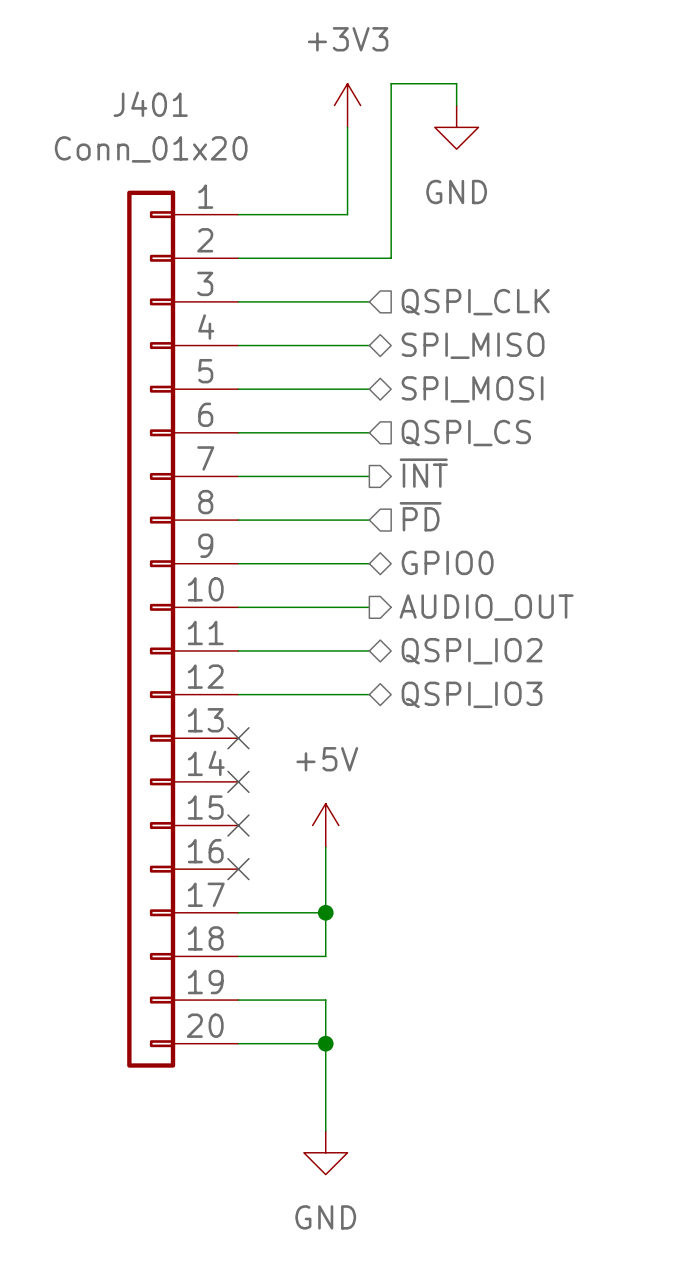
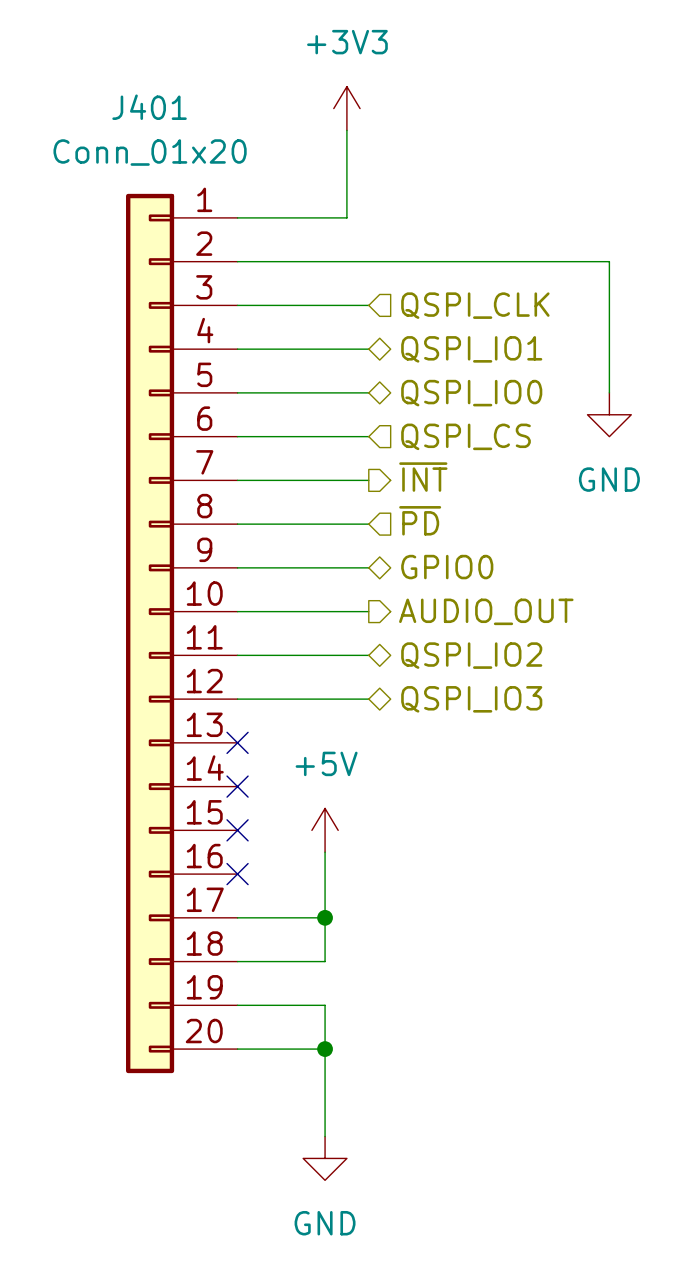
wire: (456, 105) (456, 83) (391, 83) (391, 258) -> (609, 392) (609, 261) (390, 261)
power symbol position: GND (456, 127) -> GND (609, 414)
hierarchical label: SPI_MISO (473, 345) -> QSPI_IO1 (471, 349)
hierarchical label: SPI_MOSI (472, 389) -> QSPI_IO0 (471, 393)

